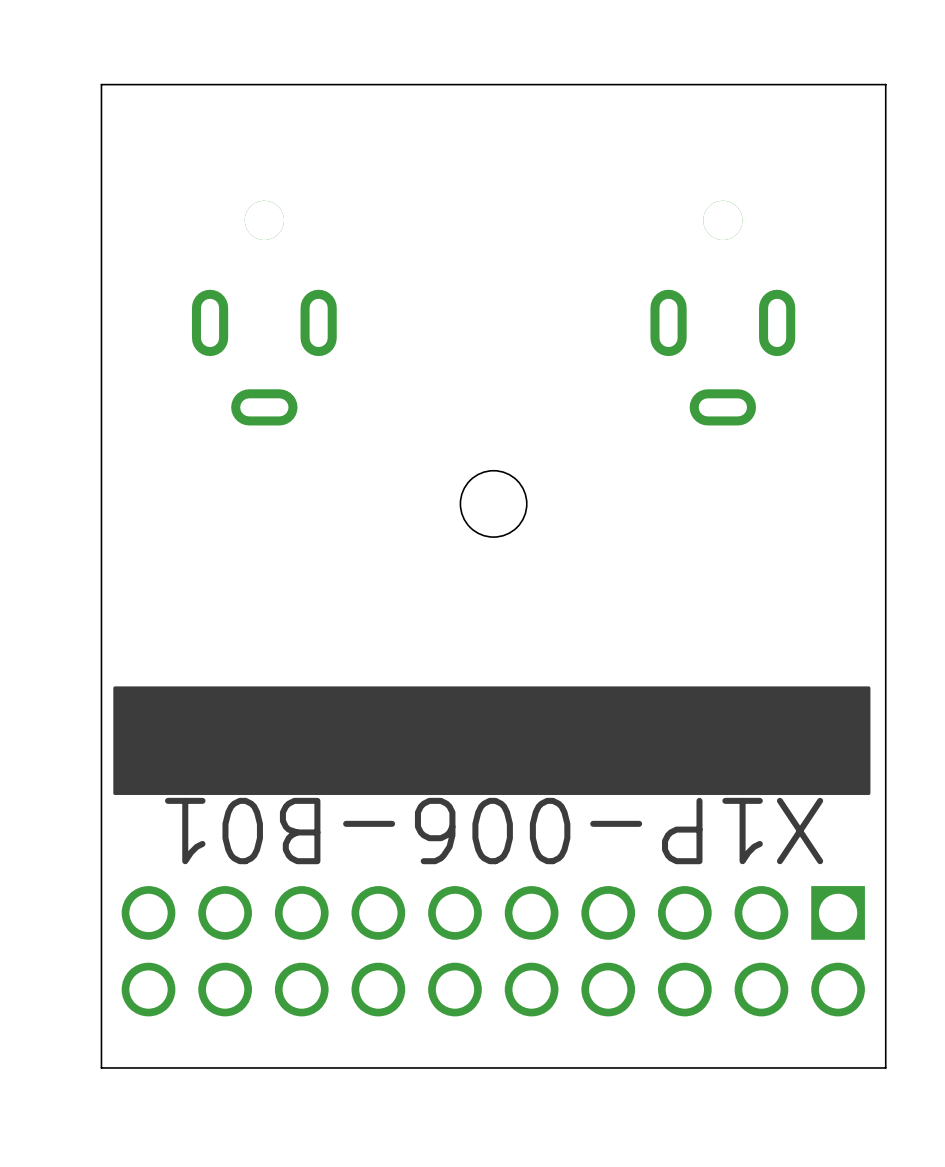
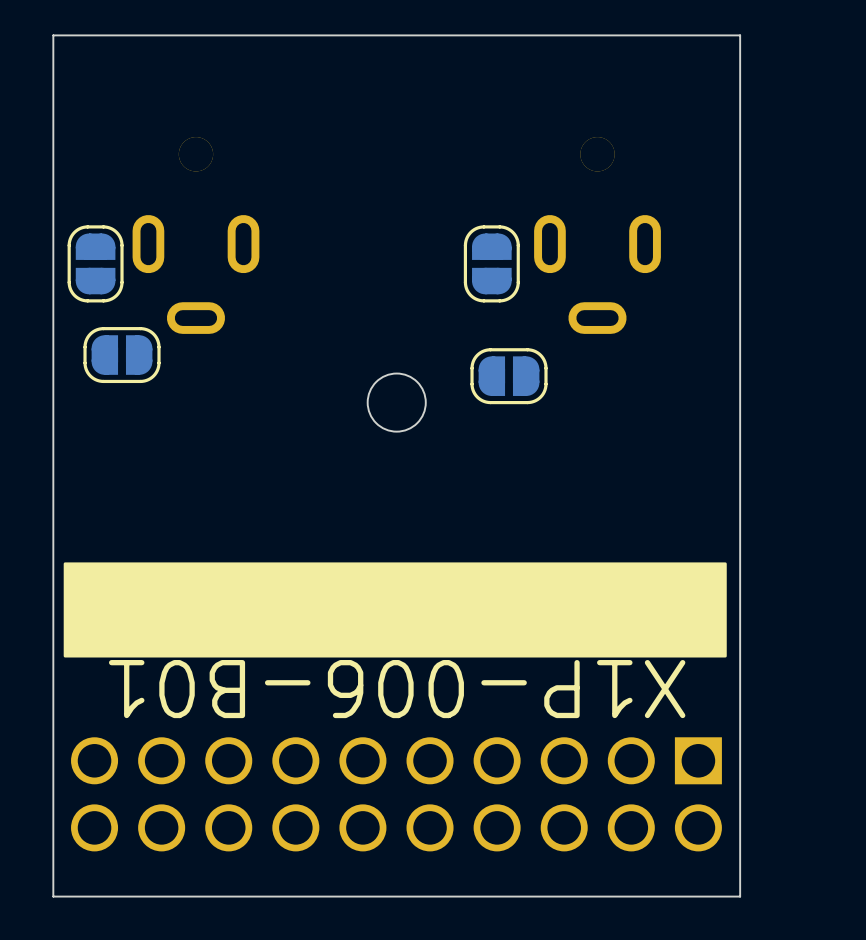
part: none -> (95, 263)
part: none -> (491, 263)
part: none -> (122, 355)
part: none -> (509, 376)

